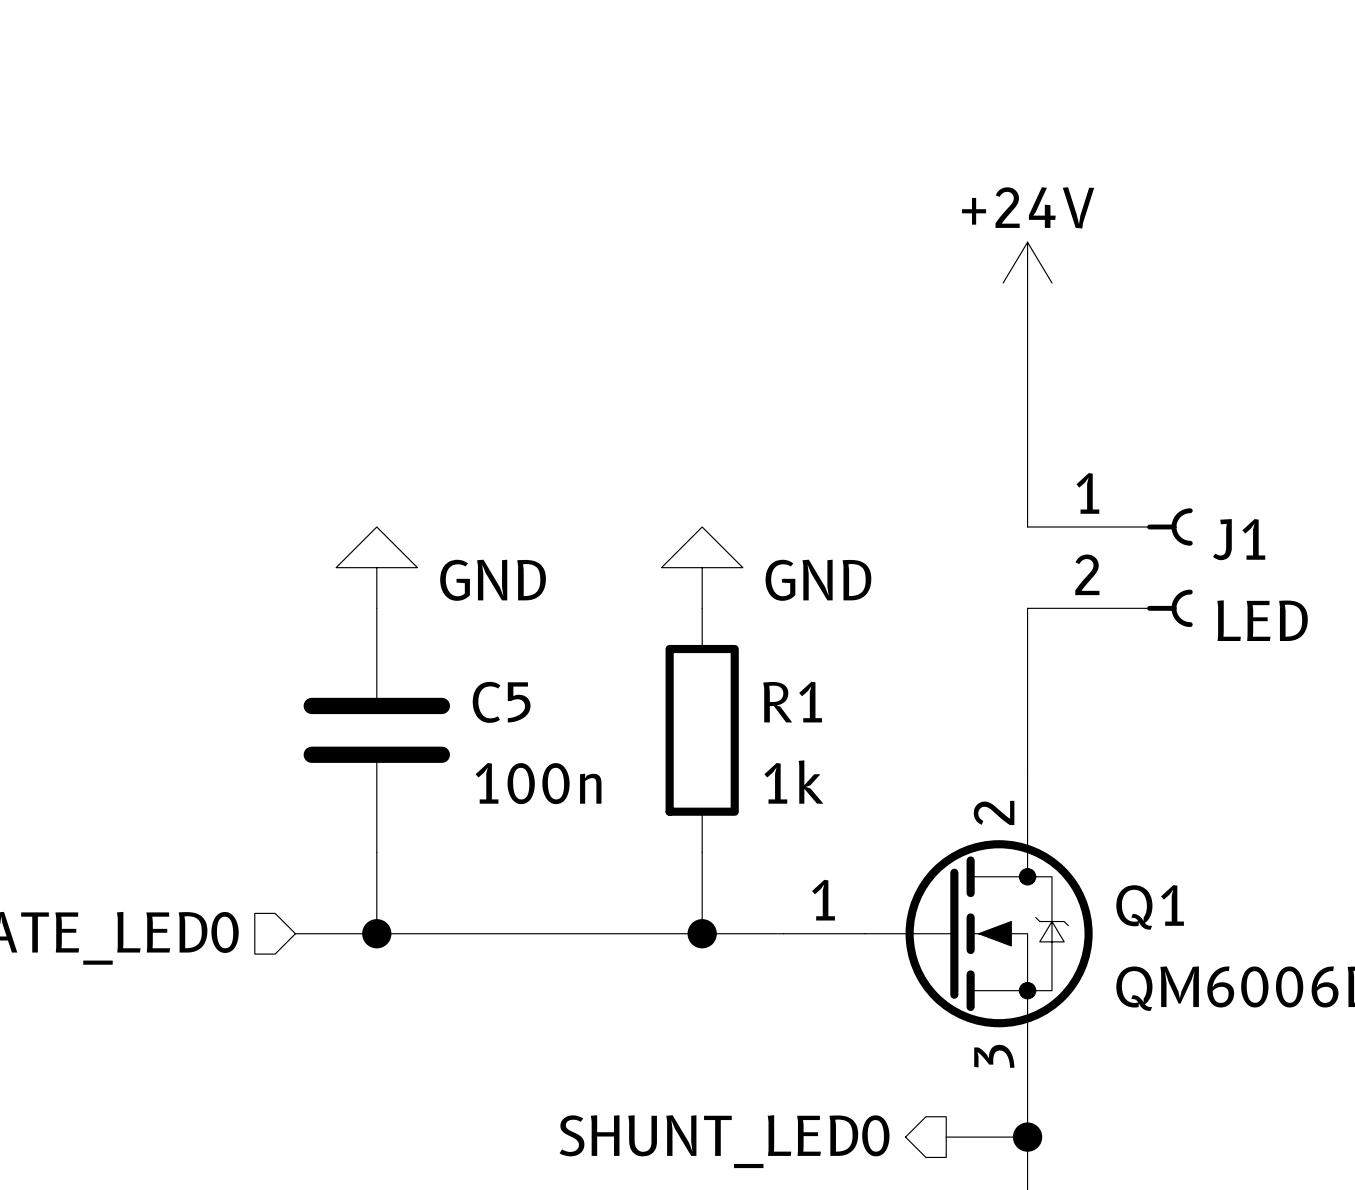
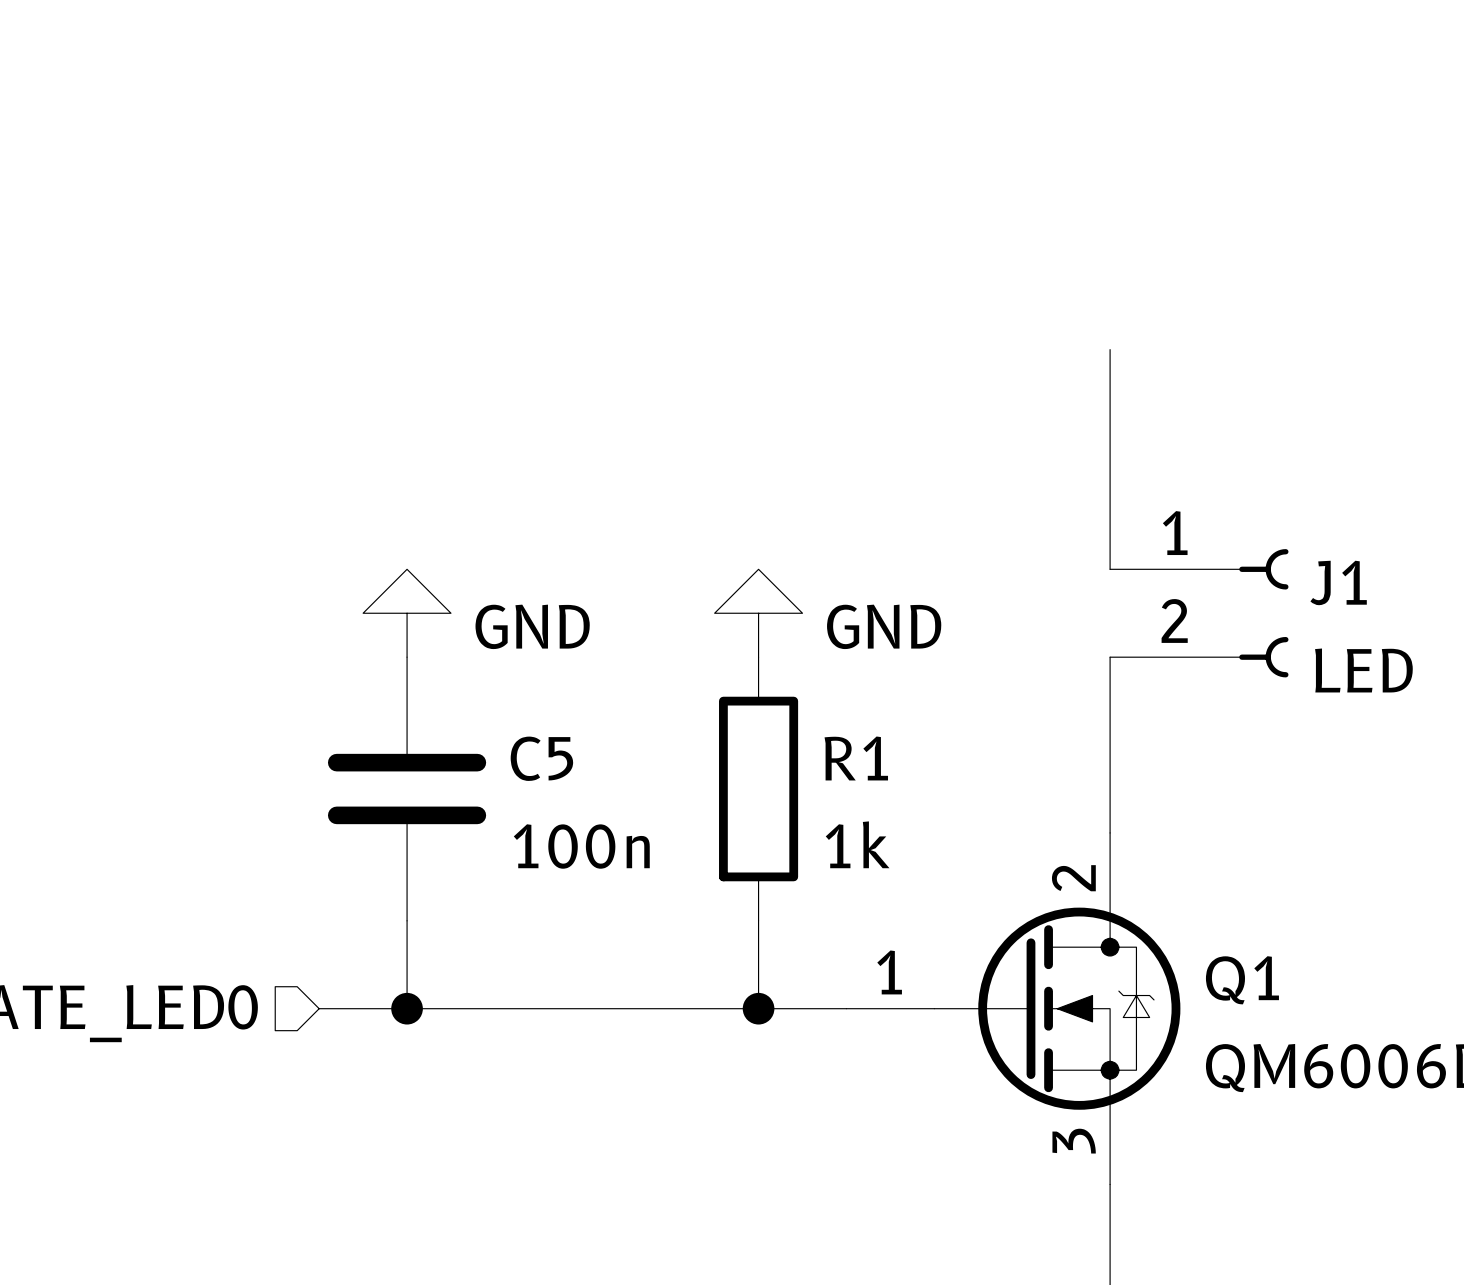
power symbol: +24V (1027, 282) -> none
wire: (946, 1137) (1027, 1137) -> none
junction: (1027, 1137) -> none
hierarchical label: SHUNT_LED0 (724, 1141) -> none

